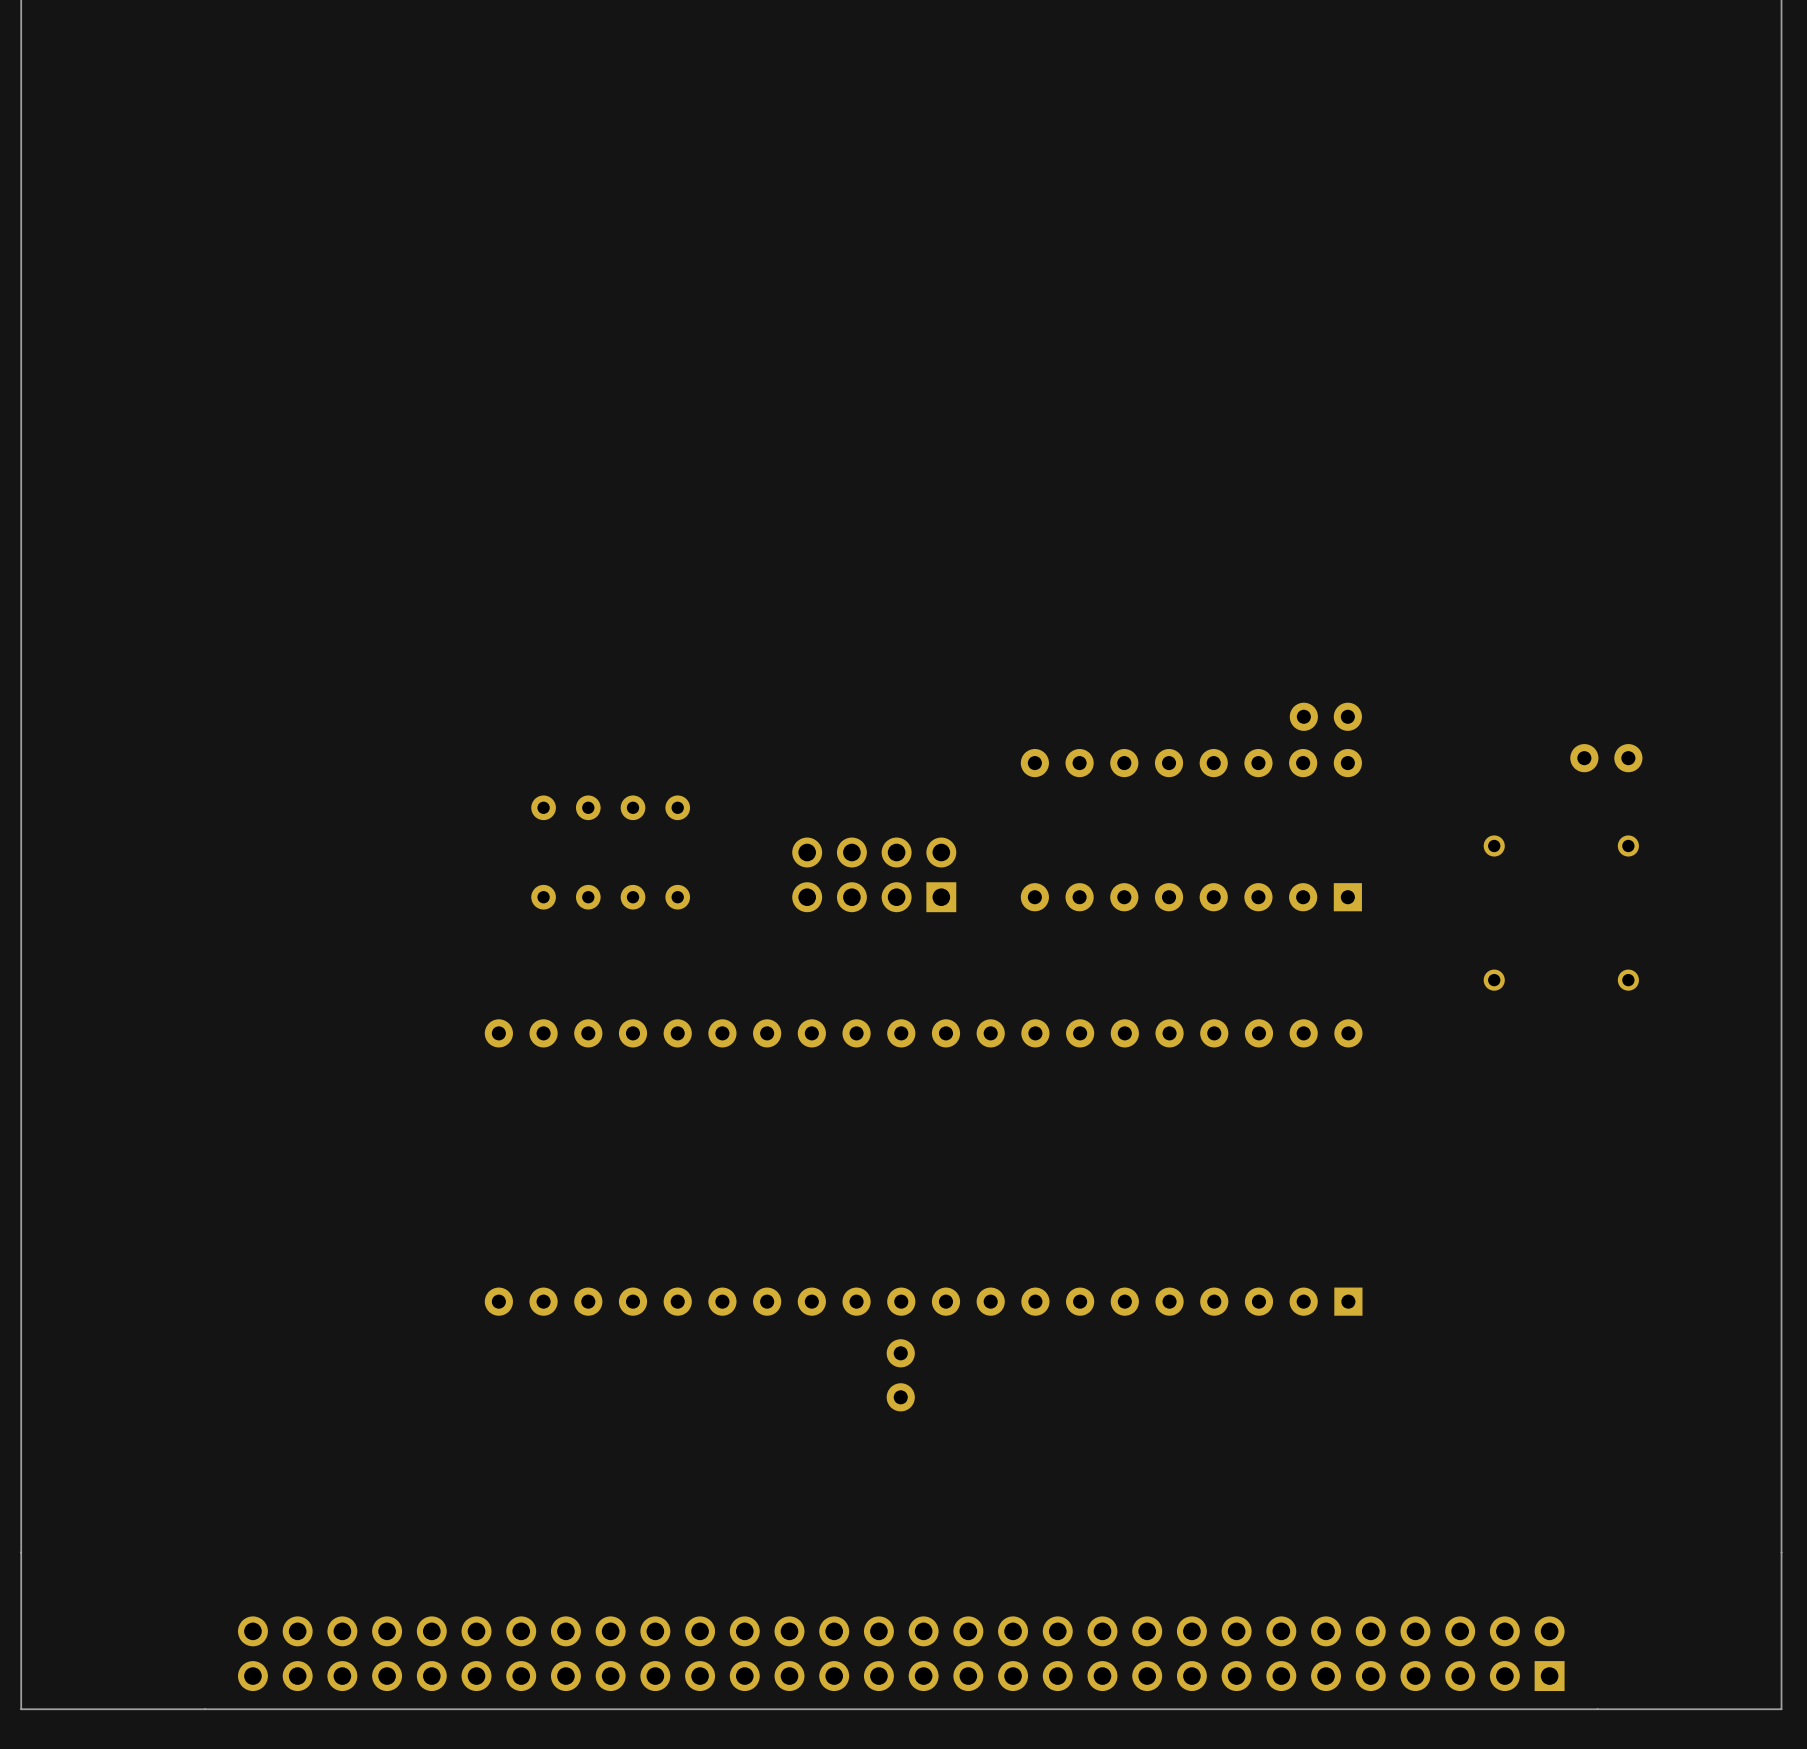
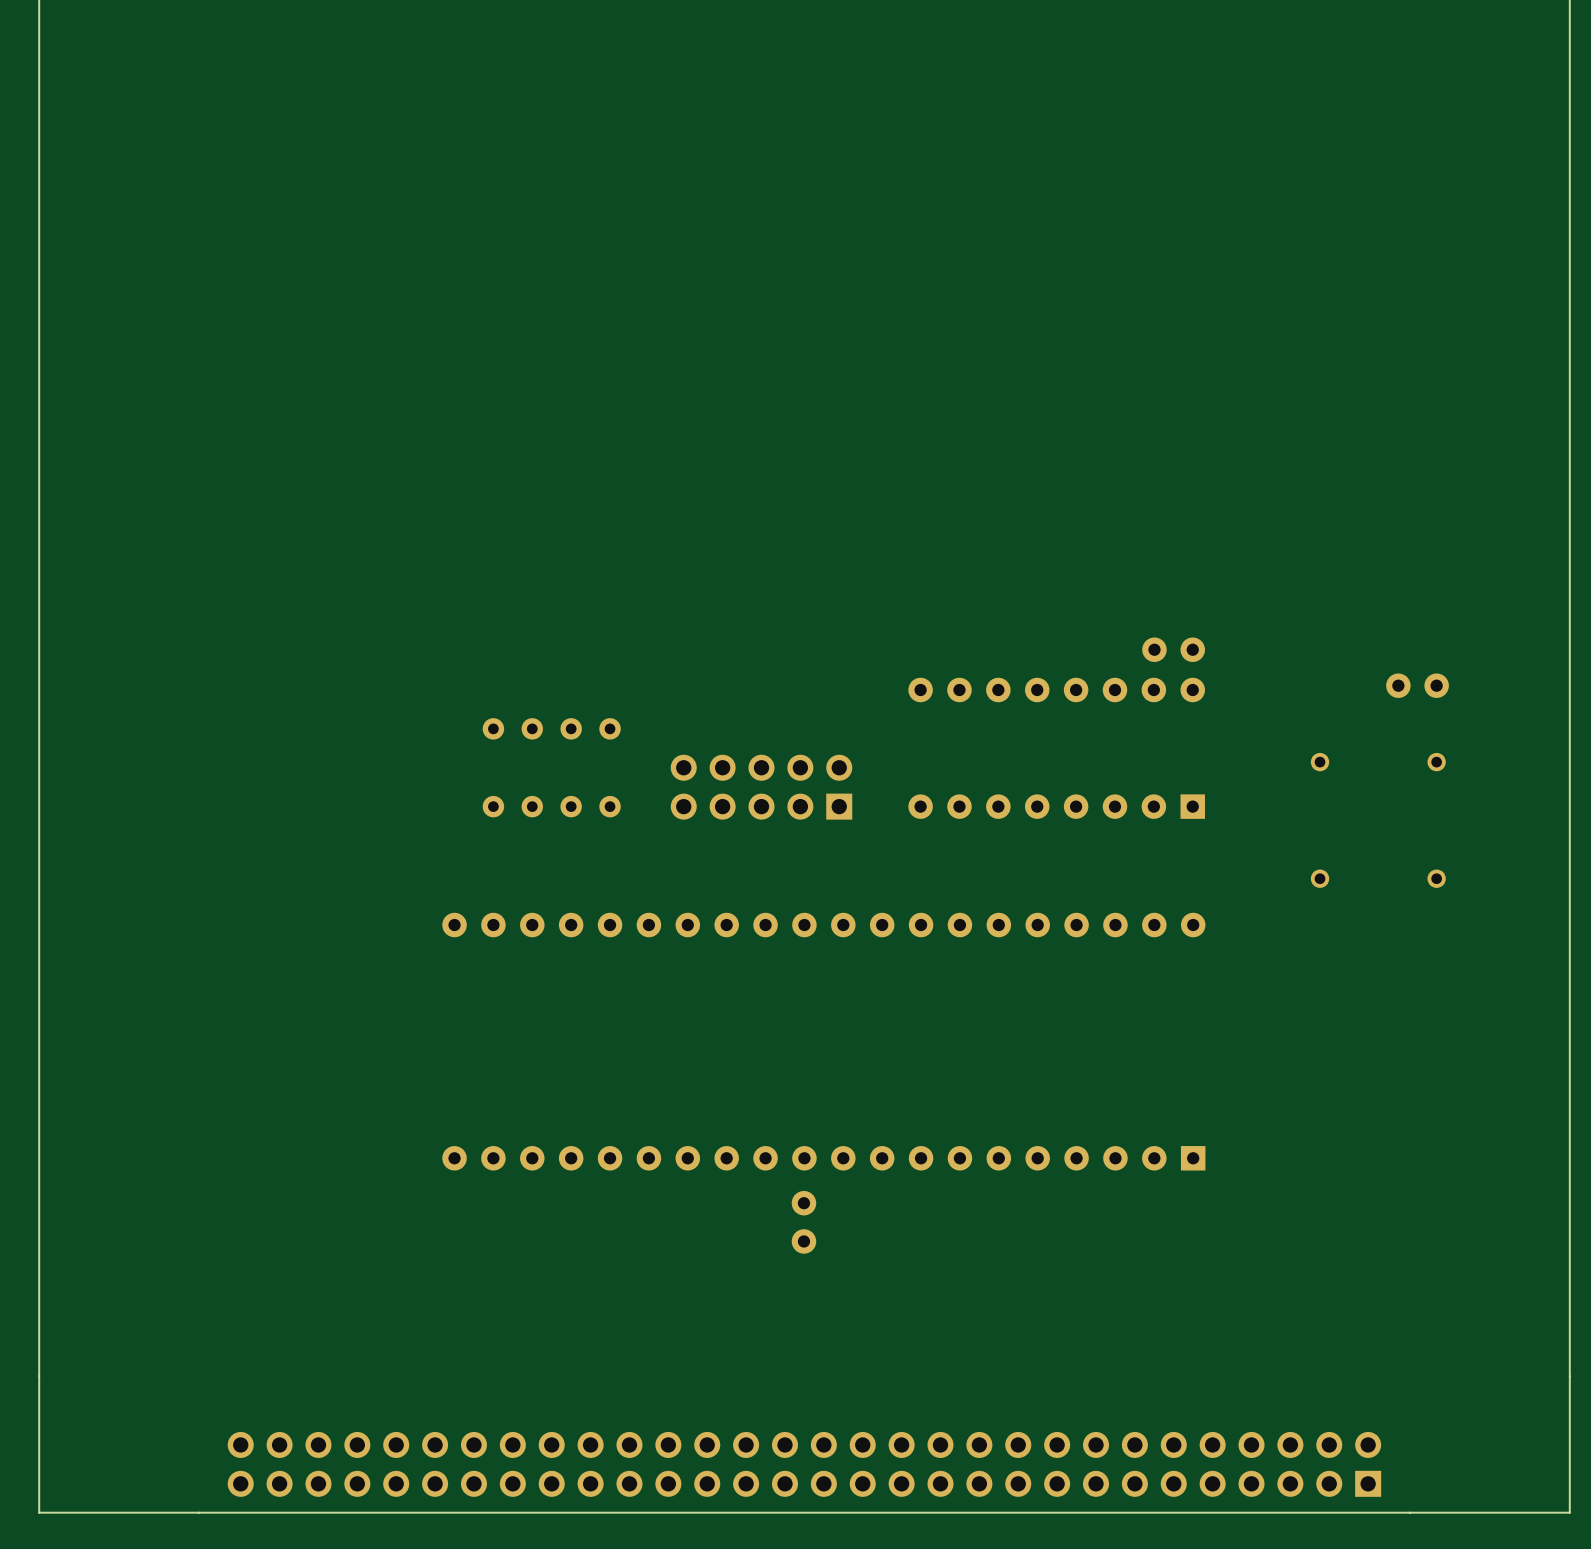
part: none -> (761, 787)

